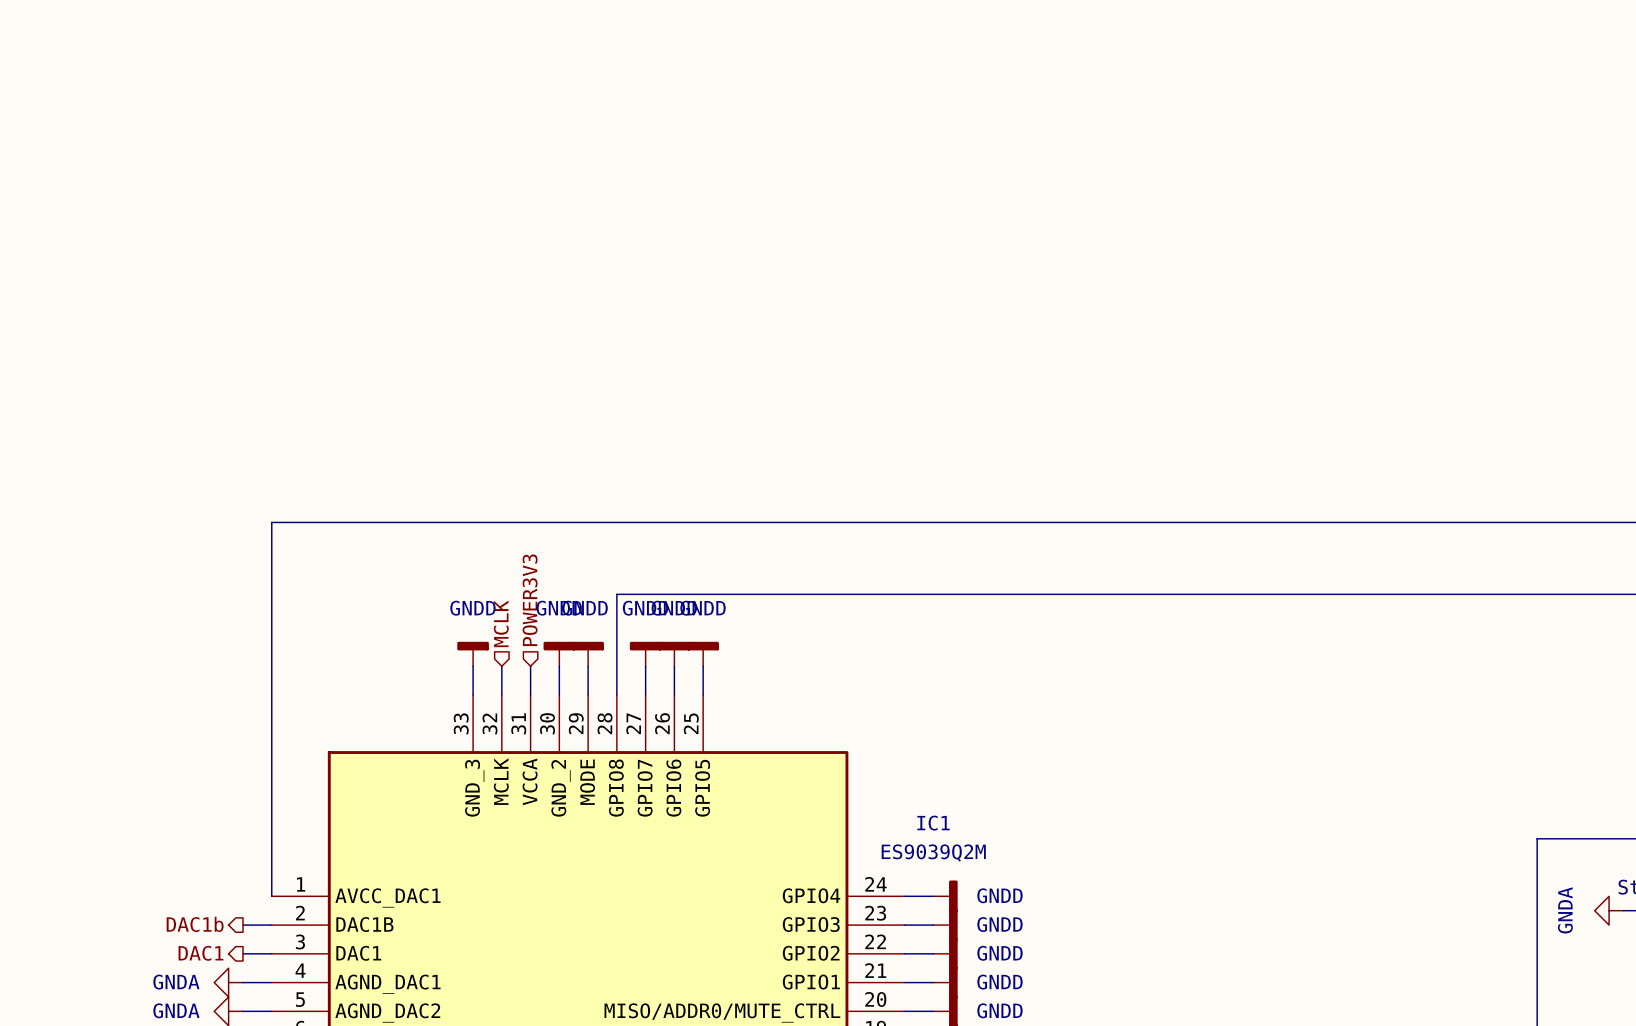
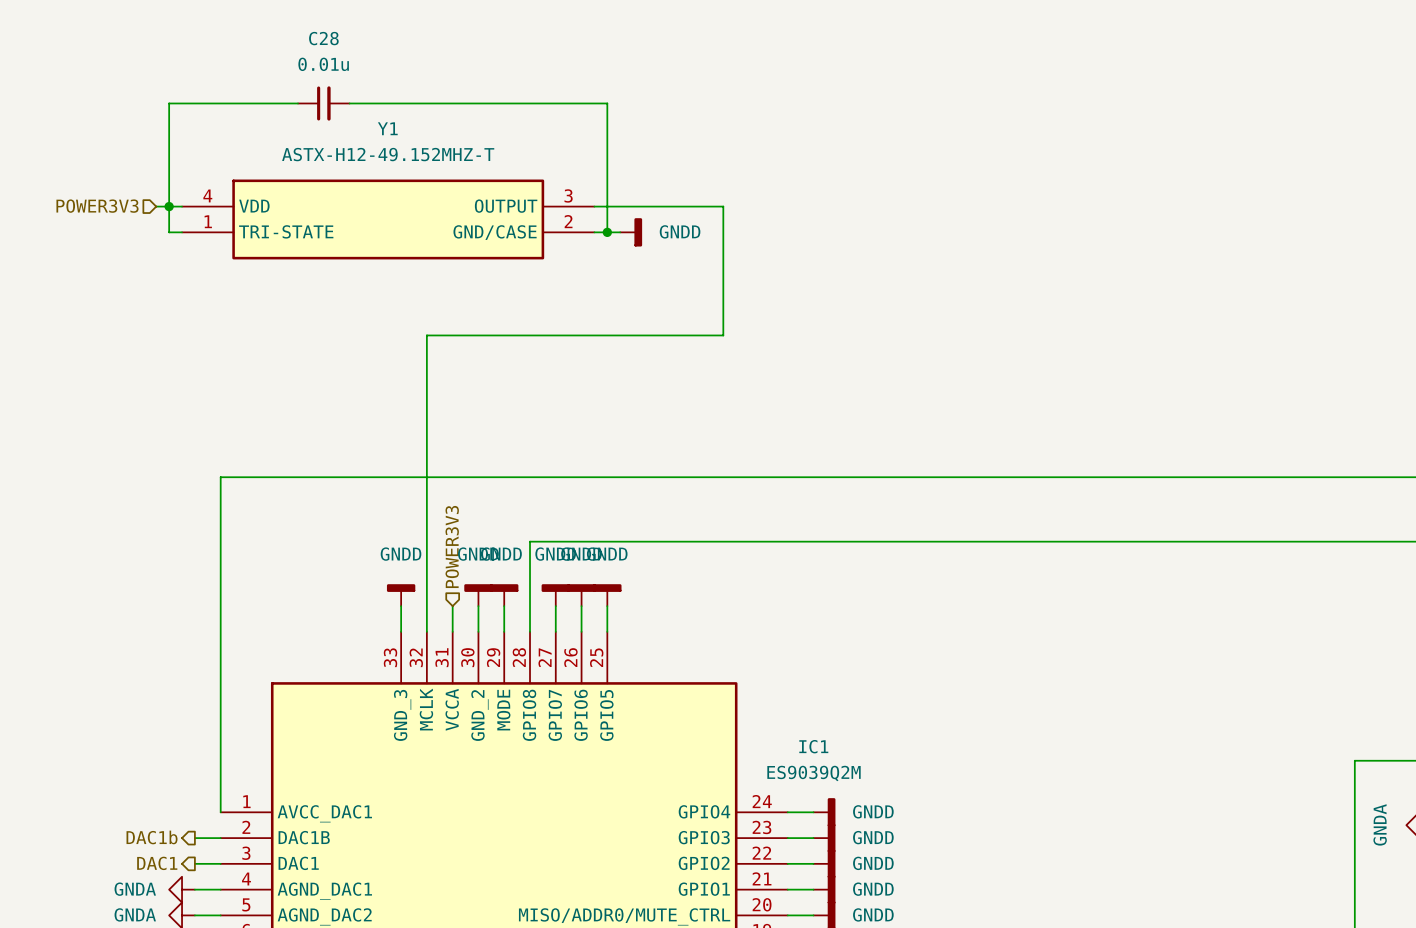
wire: none -> (298, 103) (169, 103) (169, 232) (182, 232)
C28: none -> 0.01u (323, 103)
wire: none -> (349, 103) (607, 103) (607, 232)
hierarchical label: none -> POWER3V3 (97, 206)
wire: none -> (156, 206) (182, 206)
junction: none -> (169, 206)
wire: none -> (594, 206) (723, 206) (723, 335) (426, 335) (426, 606)
Y1: none -> ASTX-H12-49.152MHZ-T (388, 219)
wire: none -> (594, 232) (620, 232)
junction: none -> (607, 232)
power symbol: none -> GNDD (631, 232)
hierarchical label: MCLK (501, 623) -> none

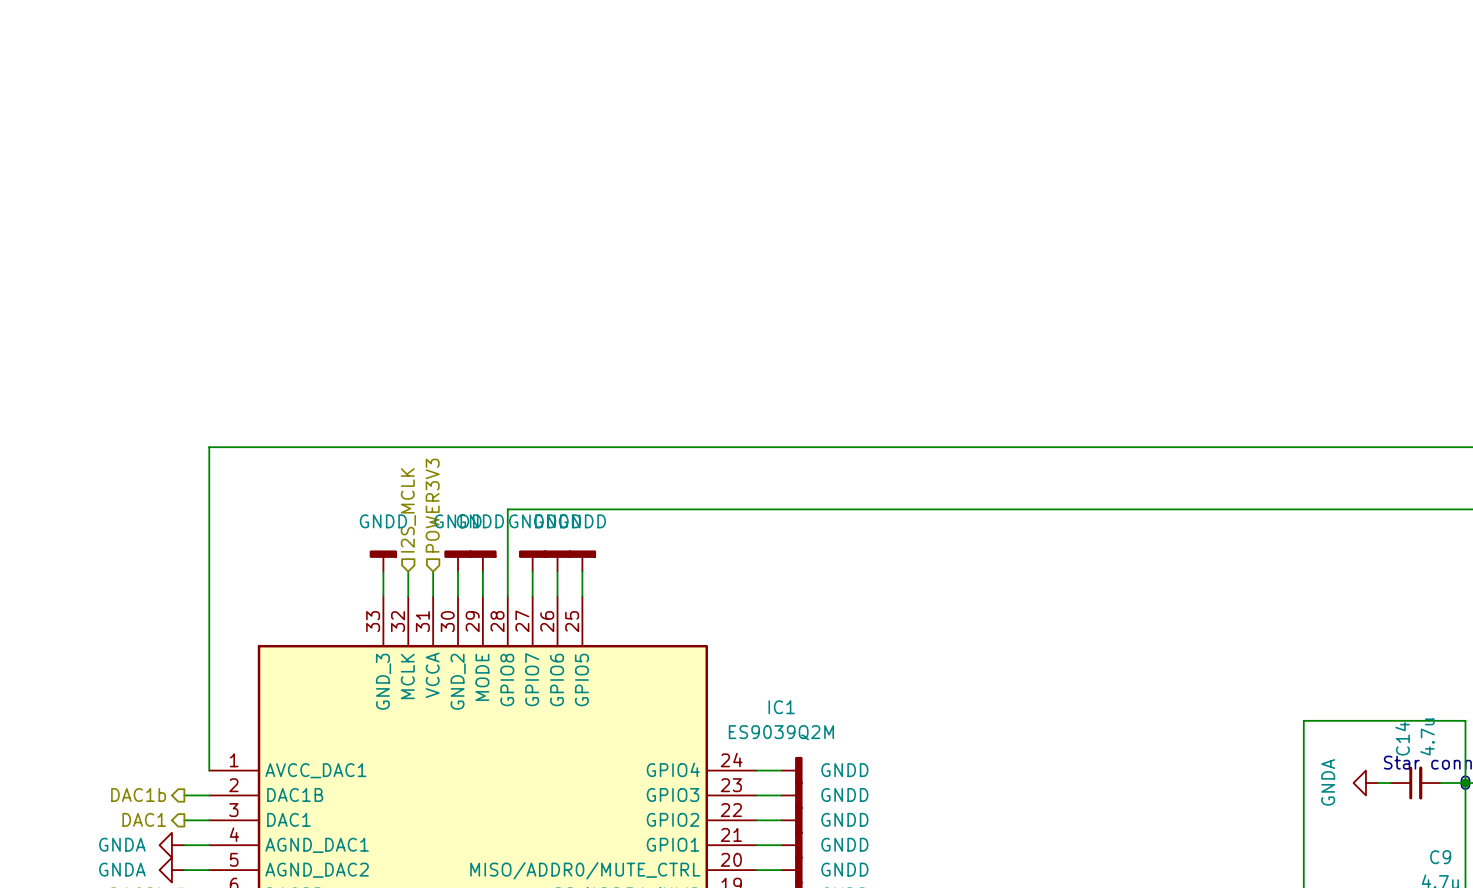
wire: (298, 103) (169, 103) (169, 232) (182, 232) -> none
C28: 0.01u (323, 103) -> none
wire: (349, 103) (607, 103) (607, 232) -> none
hierarchical label: POWER3V3 (97, 206) -> none
wire: (156, 206) (182, 206) -> none
junction: (169, 206) -> none
wire: (594, 206) (723, 206) (723, 335) (426, 335) (426, 606) -> none
Y1: ASTX-H12-49.152MHZ-T (388, 219) -> none
wire: (594, 232) (620, 232) -> none
junction: (607, 232) -> none
power symbol: GNDD (631, 232) -> none
hierarchical label: none -> I2S_MCLK (408, 510)

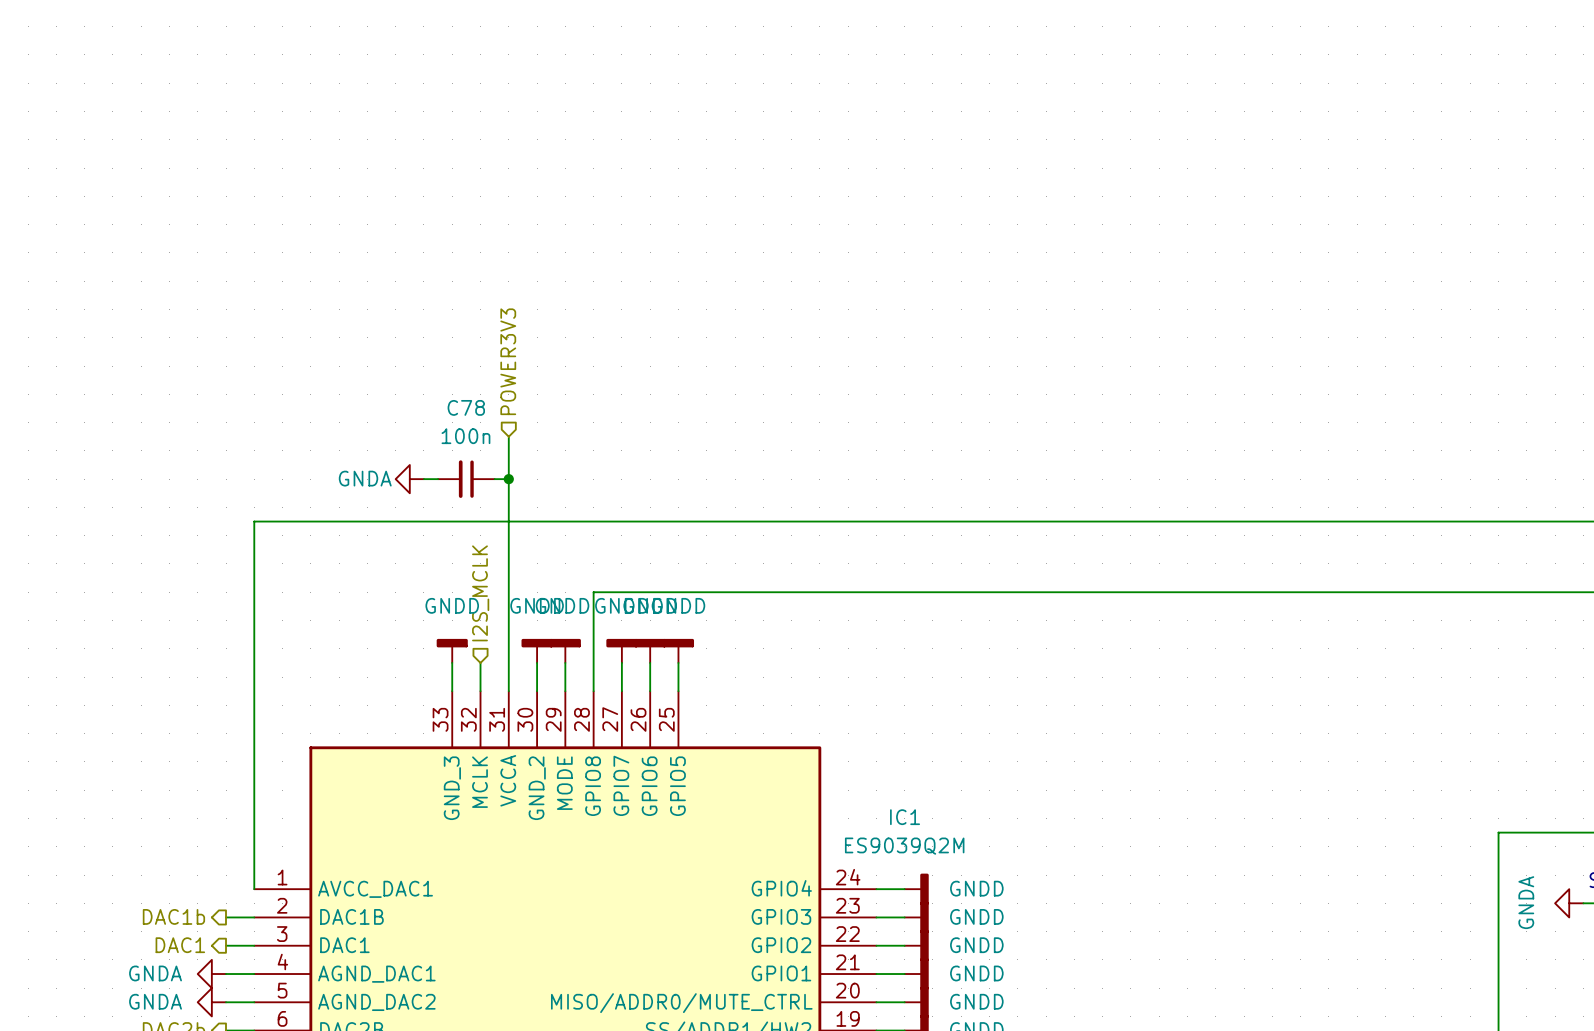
wire: none -> (508, 436) (508, 662)
power symbol: none -> GNDA (409, 479)
wire: none -> (423, 479) (438, 479)
C78: none -> 100n (466, 479)
wire: none -> (494, 479) (508, 479)
junction: none -> (508, 479)
hierarchical label position: POWER3V3 (432, 505) -> POWER3V3 (508, 361)

